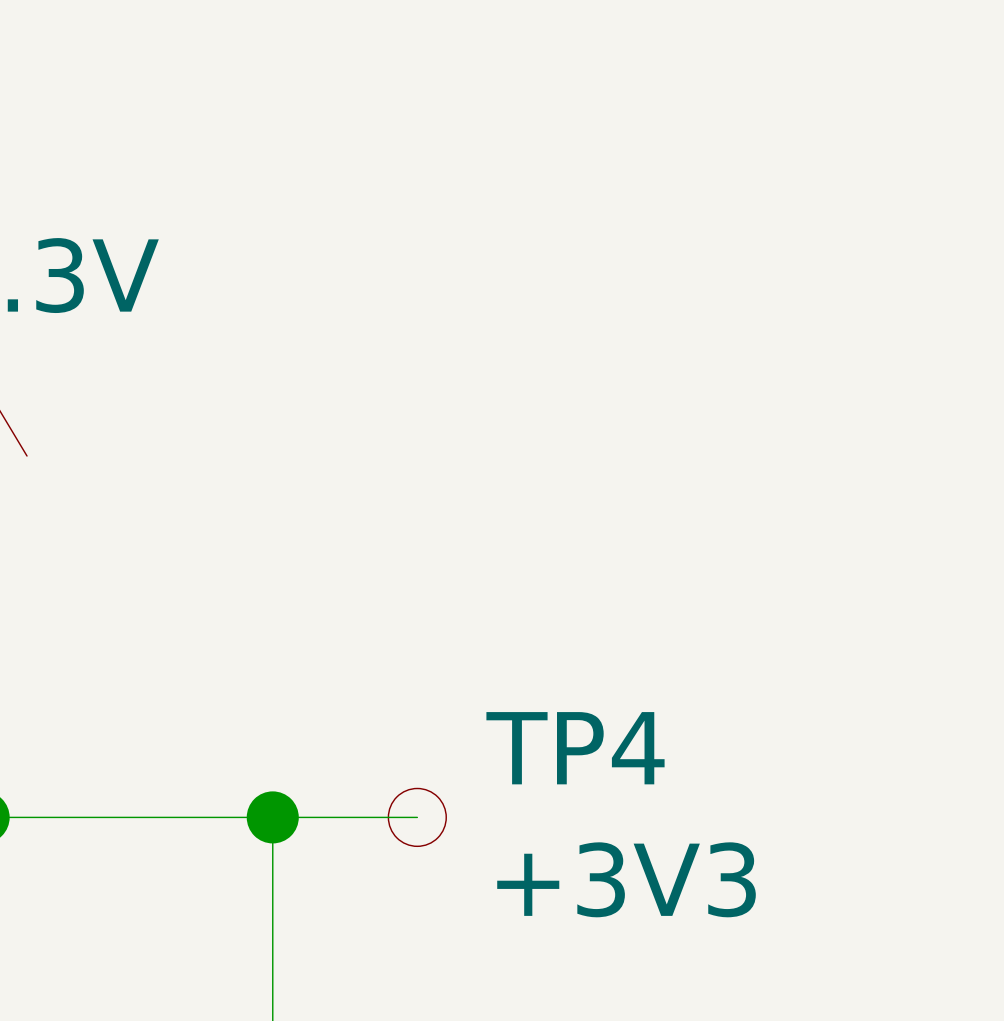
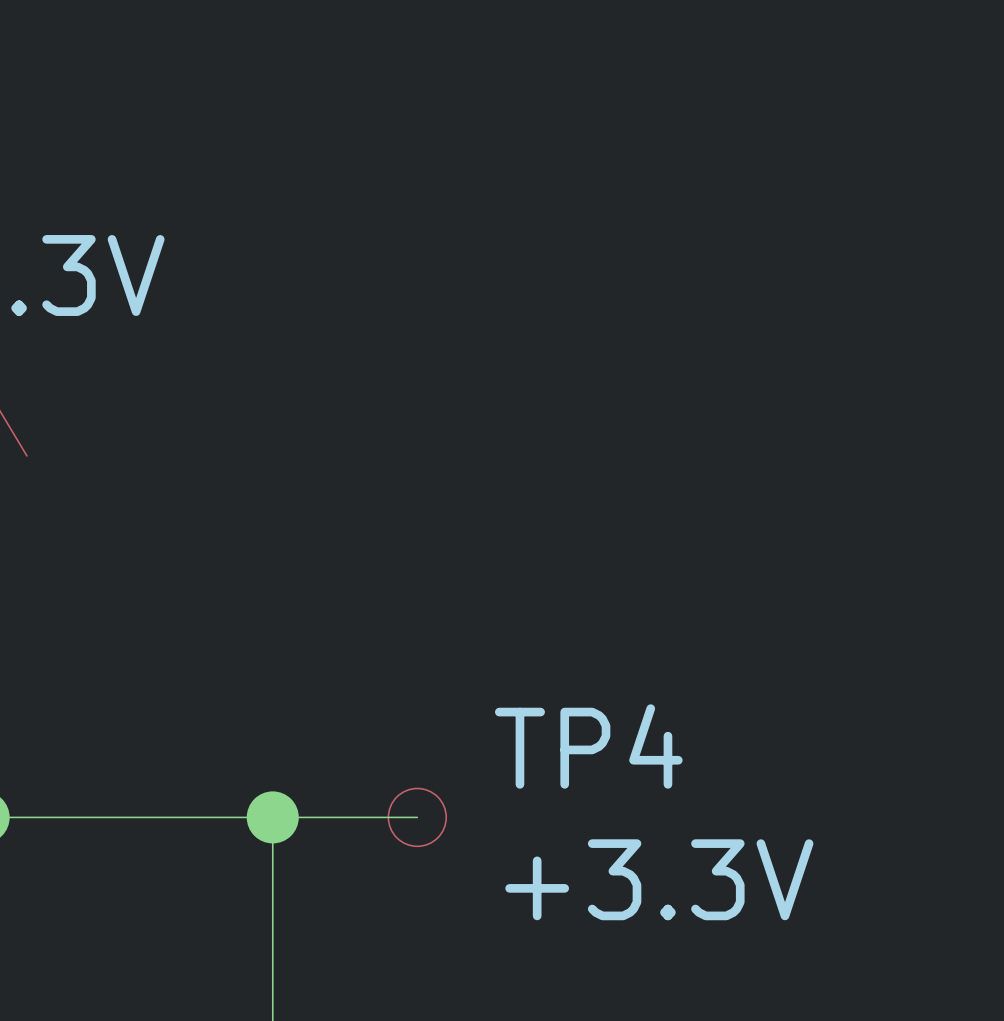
TP4 value: +3V3 (626, 879) -> +3.3V (659, 879)

